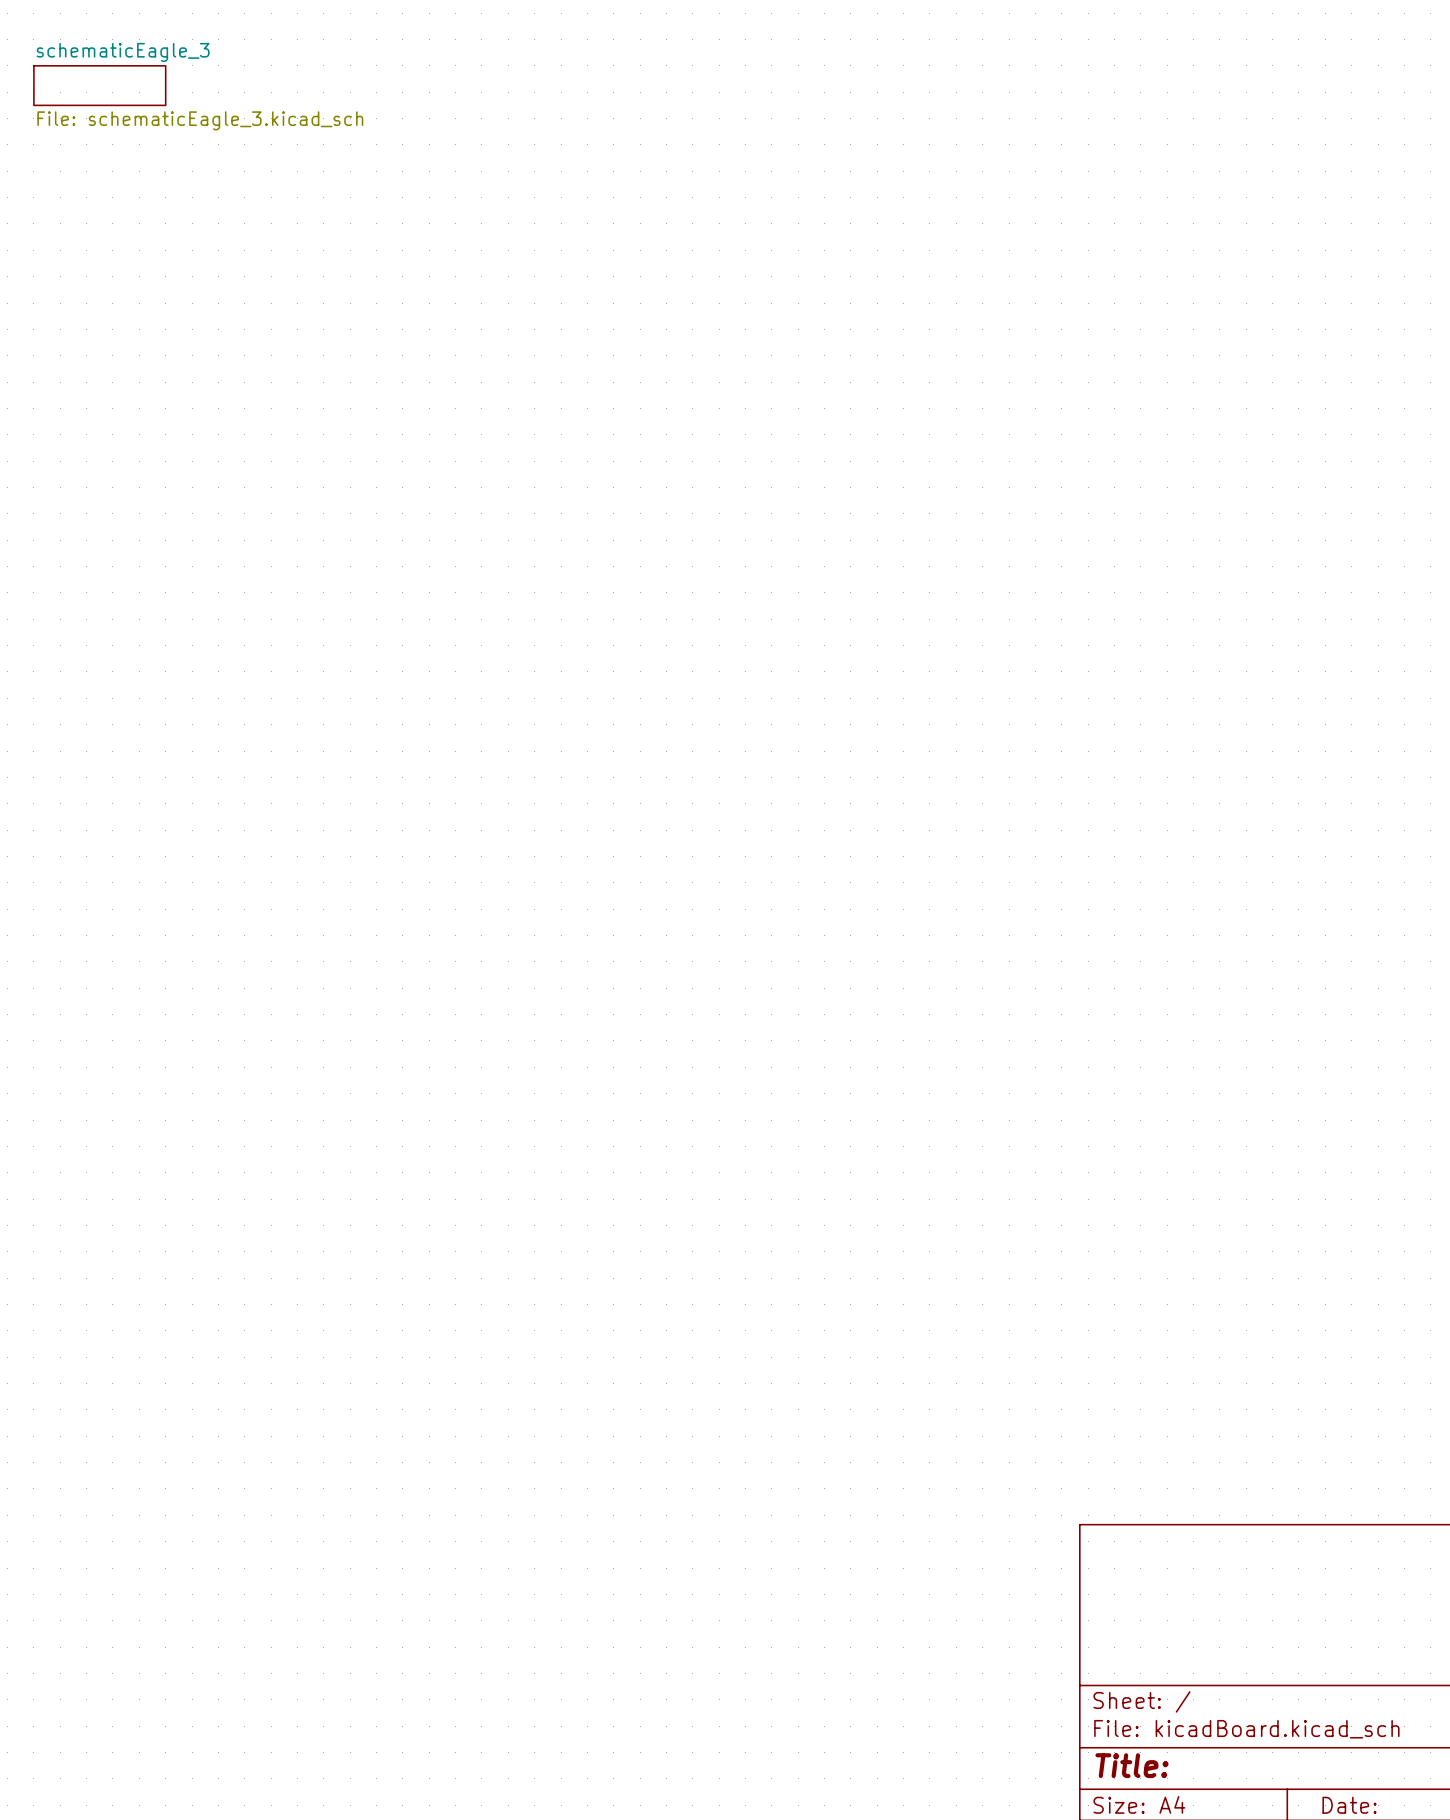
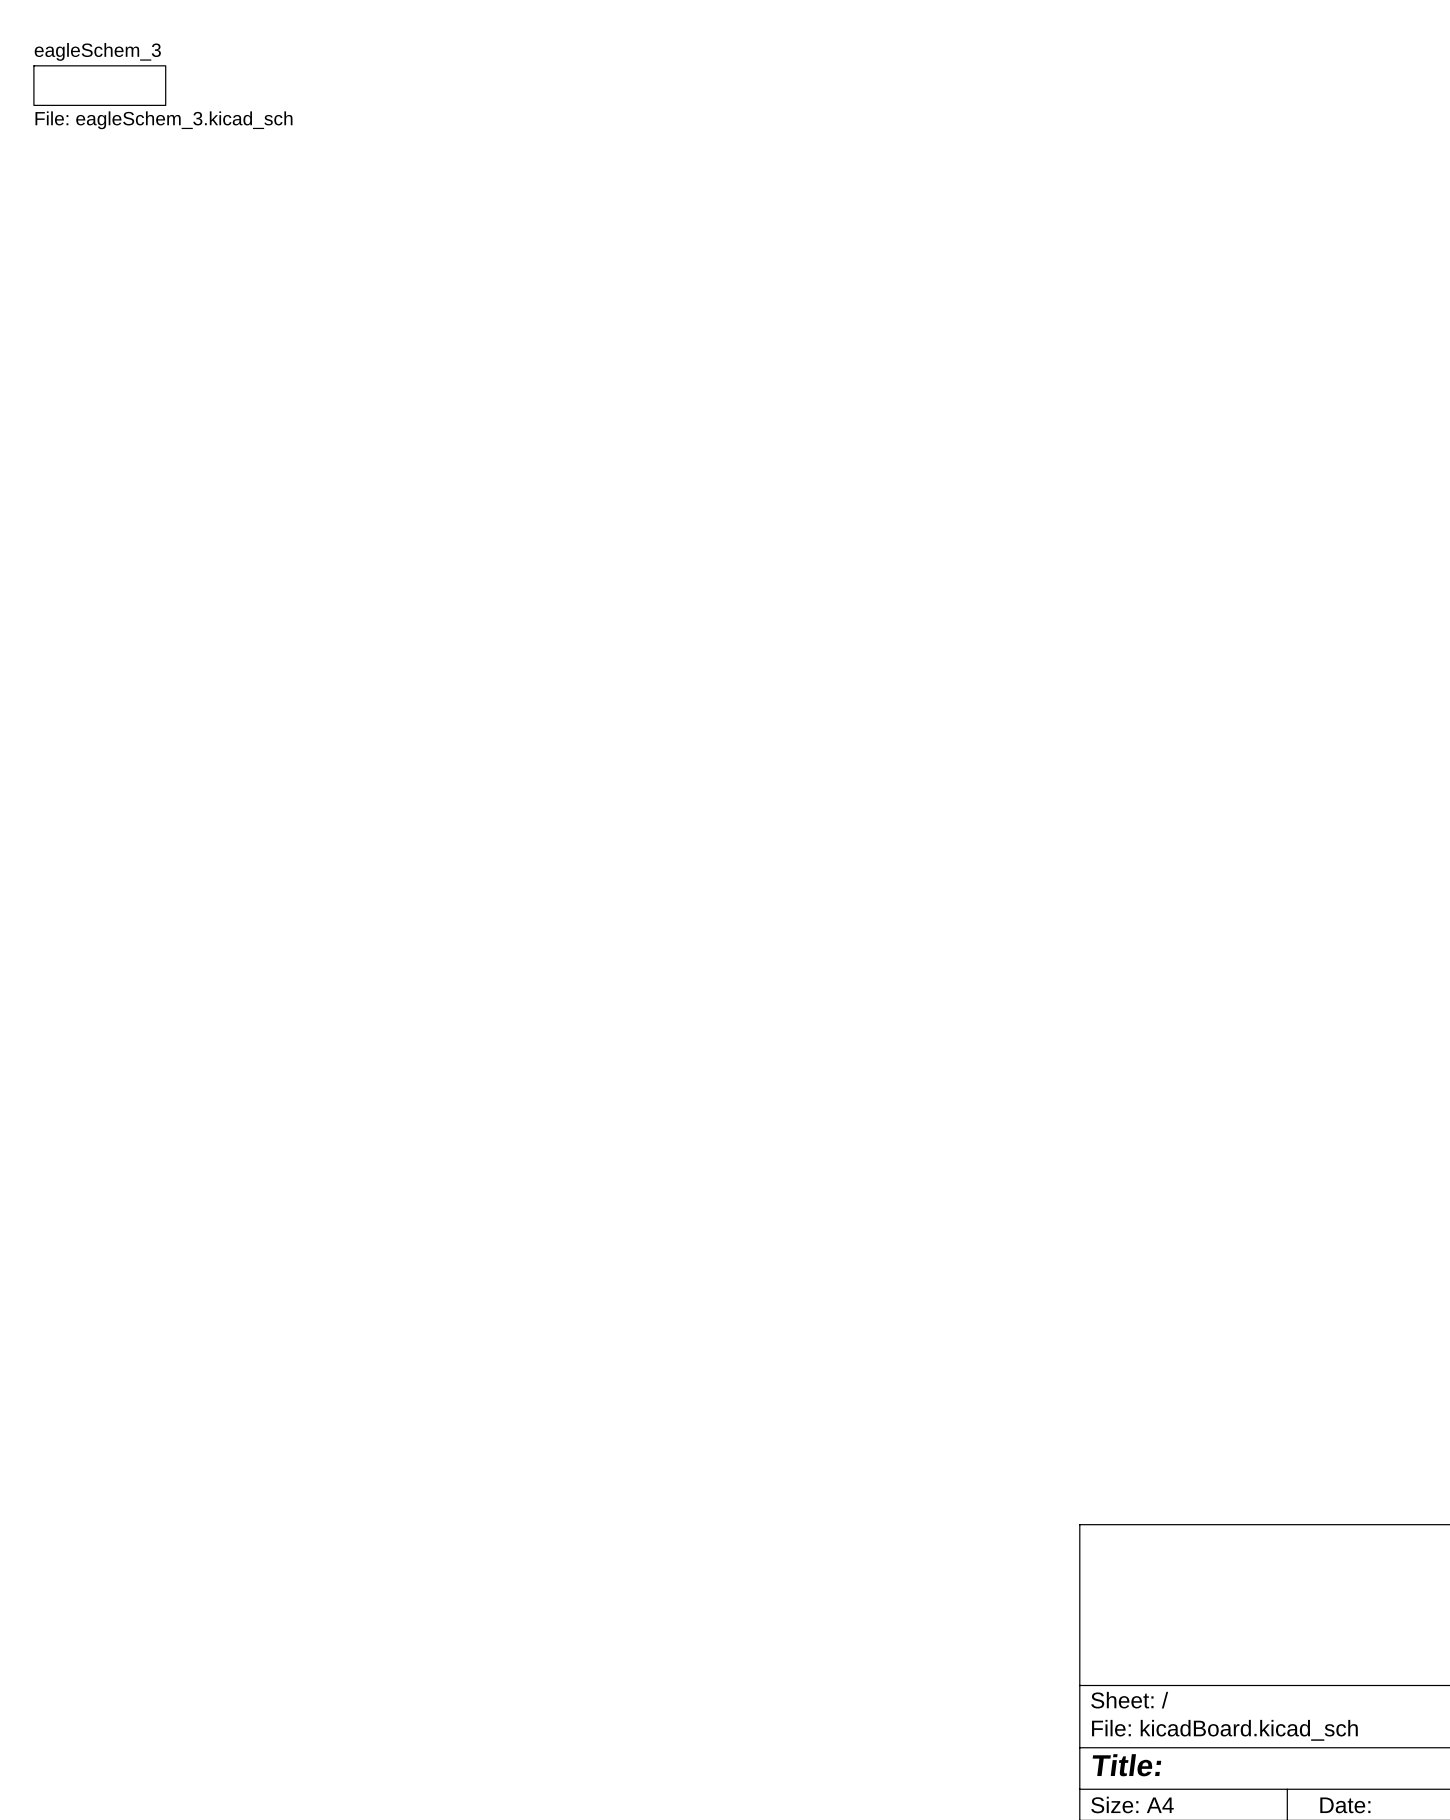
sheet schematicEagle_3 name: schematicEagle_3 (123, 52) -> eagleSchem_3 (97, 51)
sheet schematicEagle_3 value: File: schematicEagle_3.kicad_sch (200, 120) -> File: eagleSchem_3.kicad_sch (163, 120)

